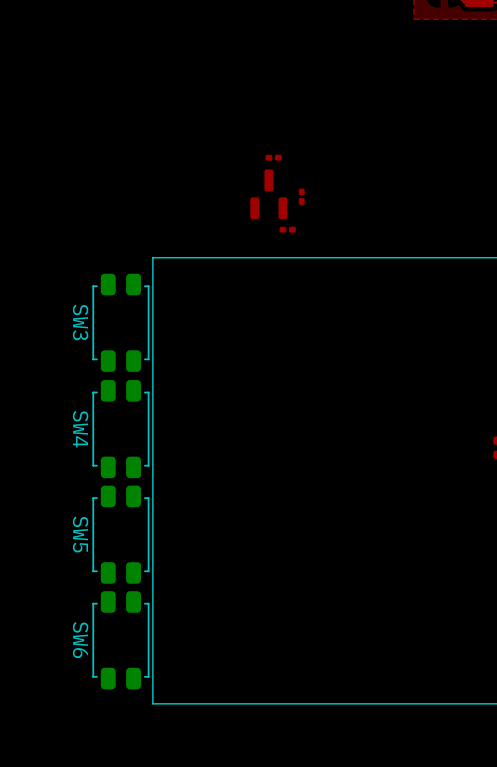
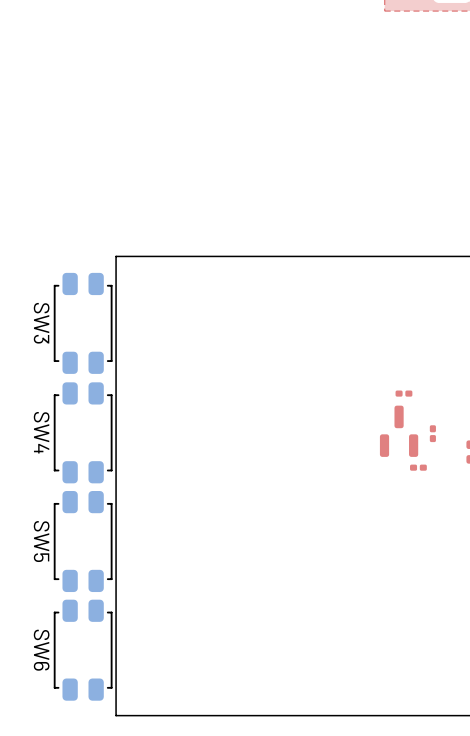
part: (273, 157) -> none
part position: (268, 194) -> (399, 431)
part: (301, 196) -> none
part: (287, 229) -> none
part: none -> (403, 393)
part: none -> (432, 433)
part: none -> (418, 467)

